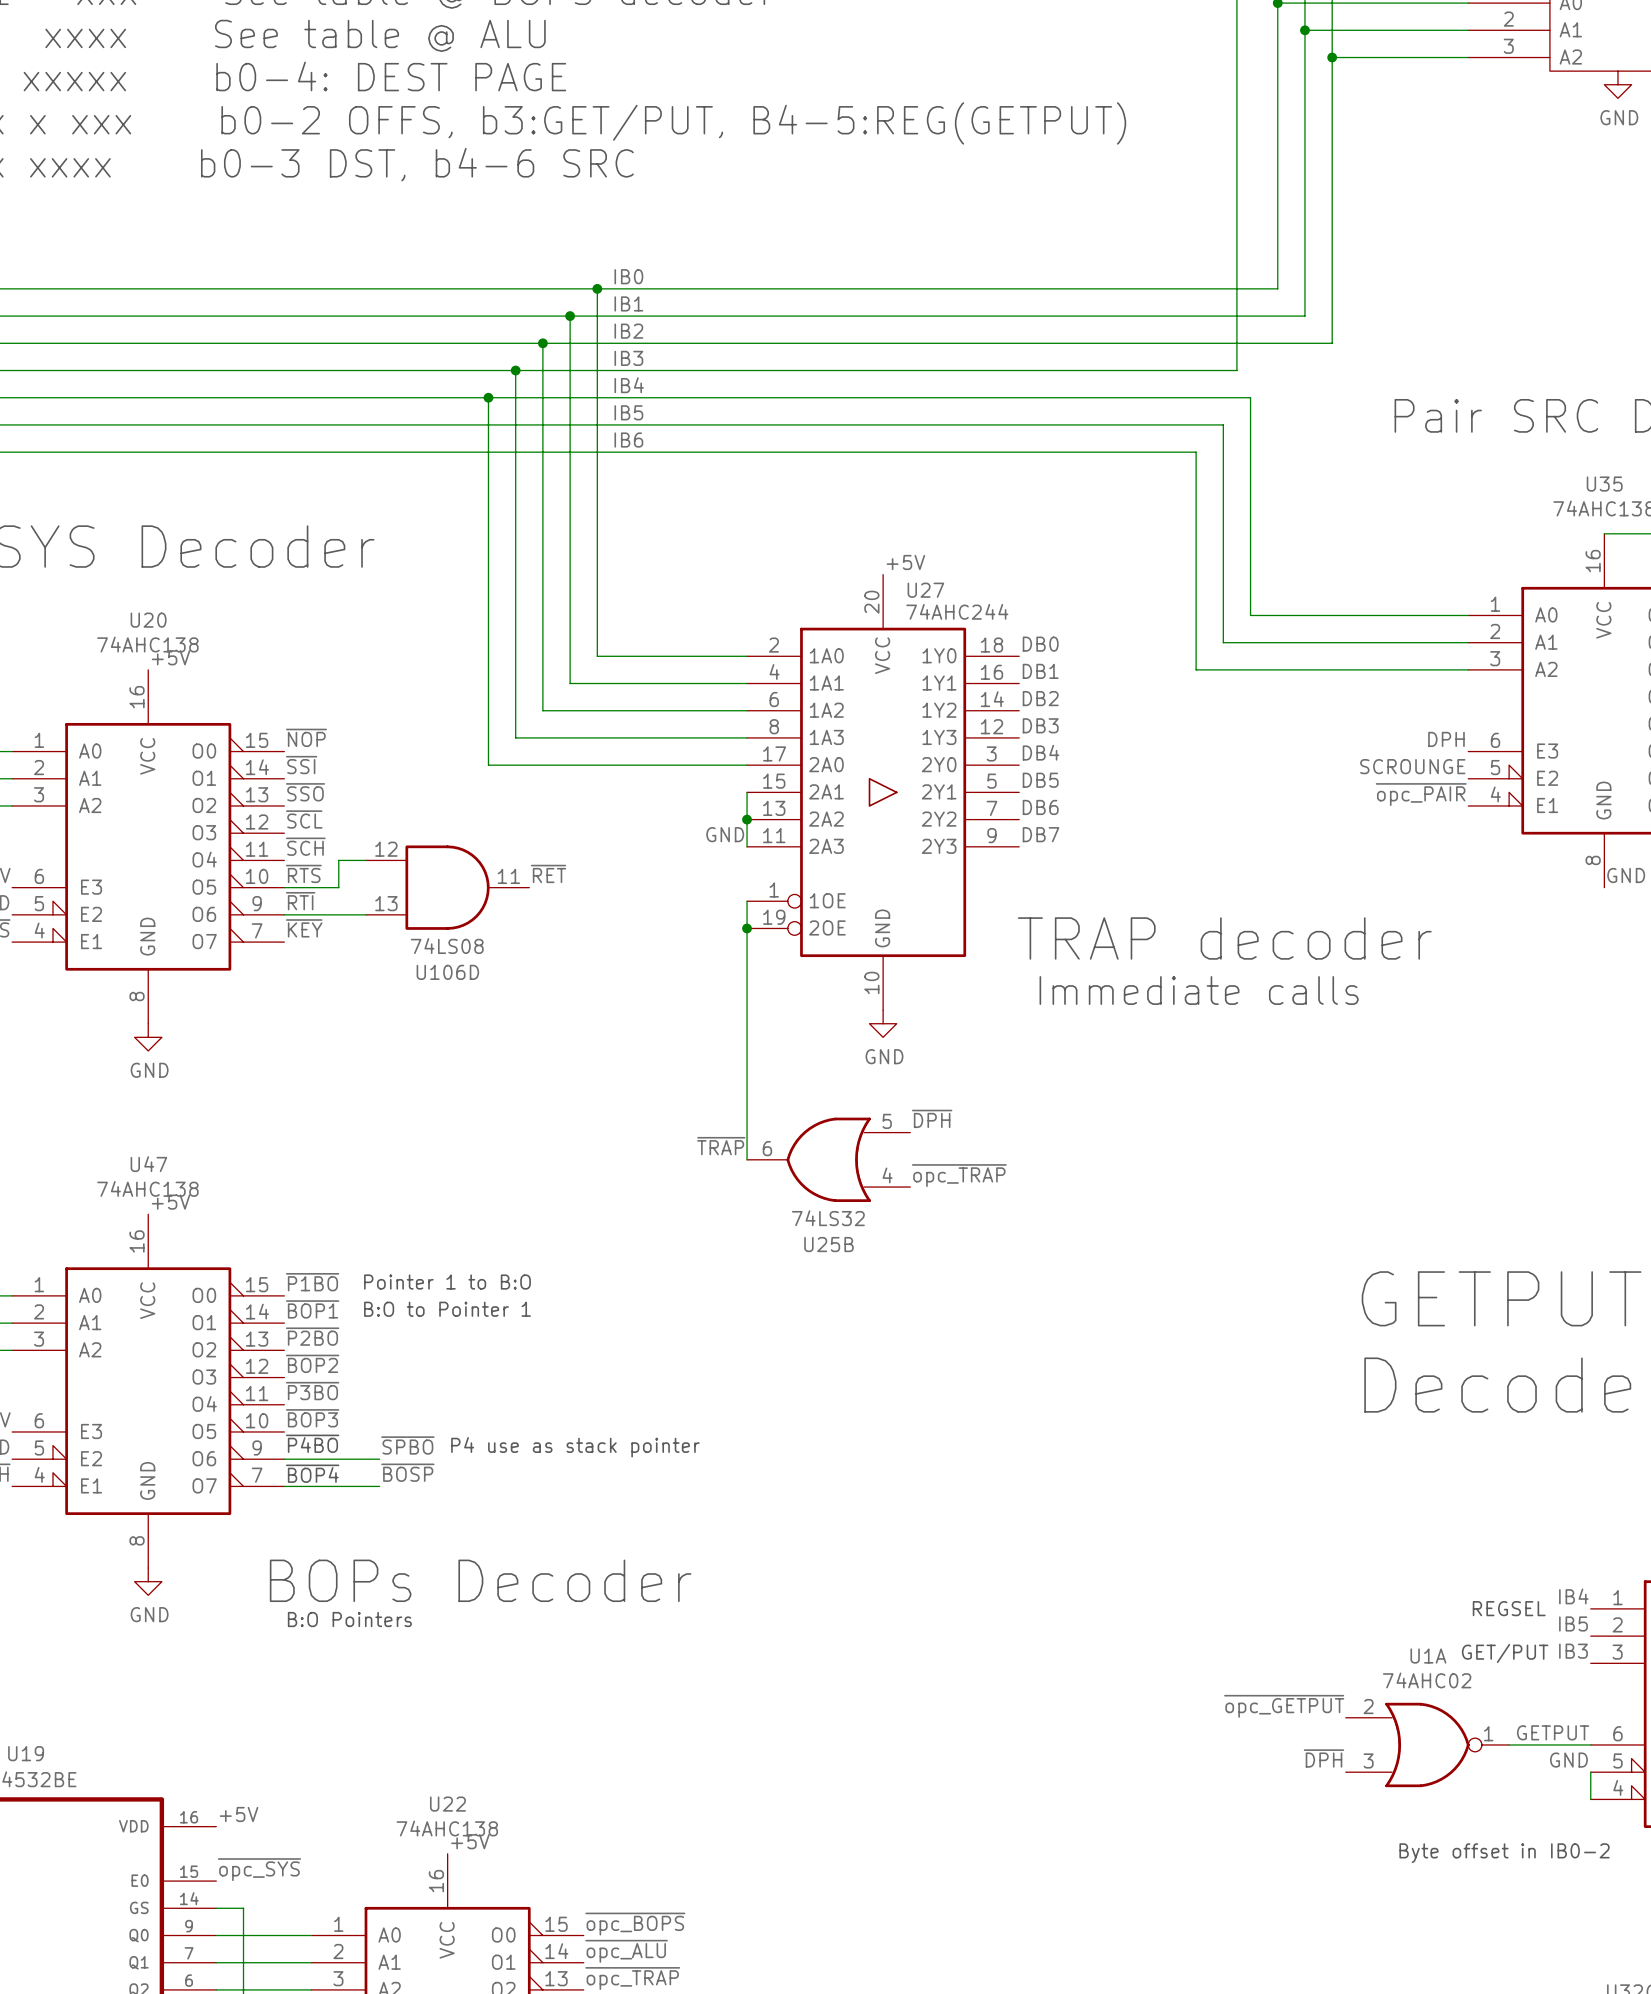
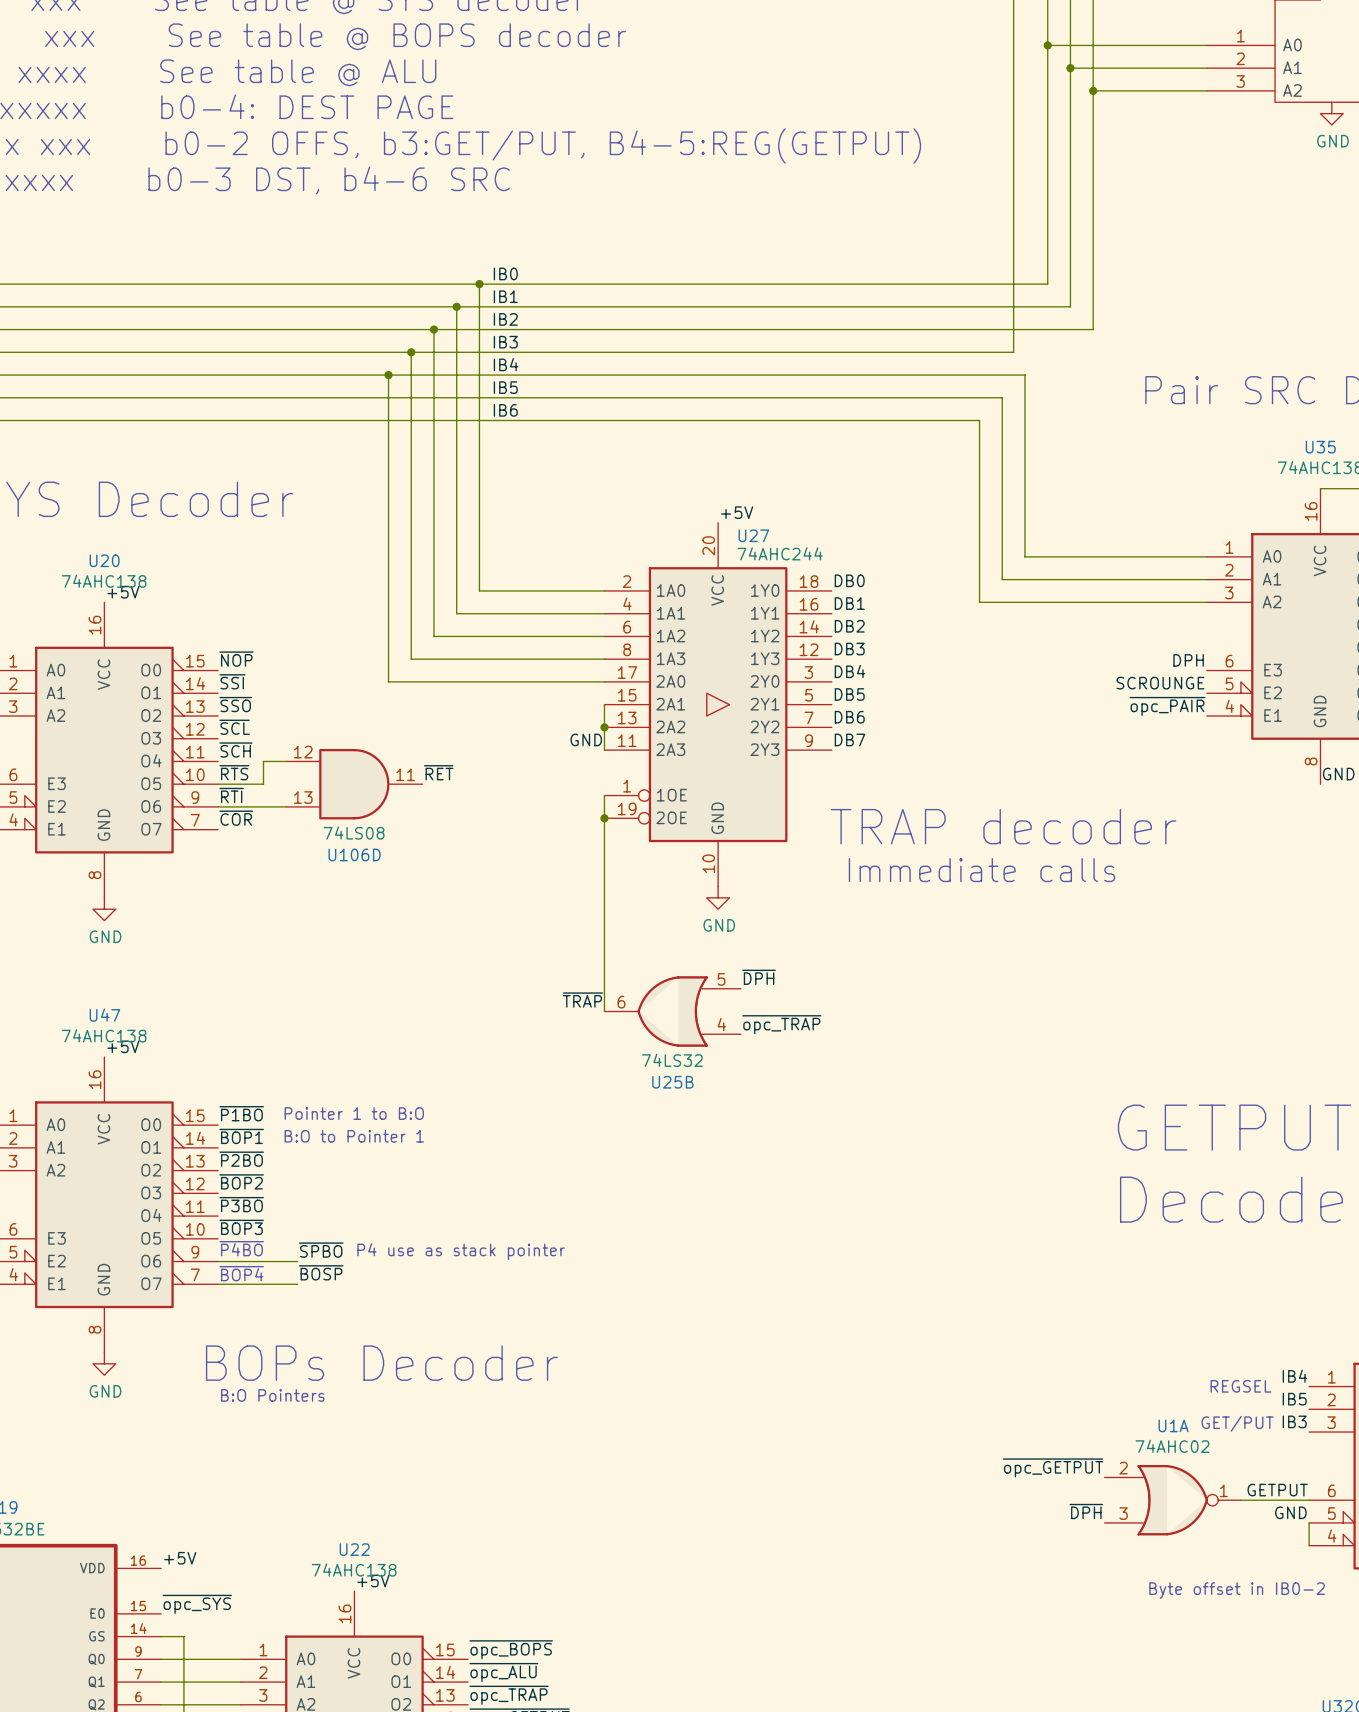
label: ~{KEY} (304, 928) -> ~{COR} (236, 818)

